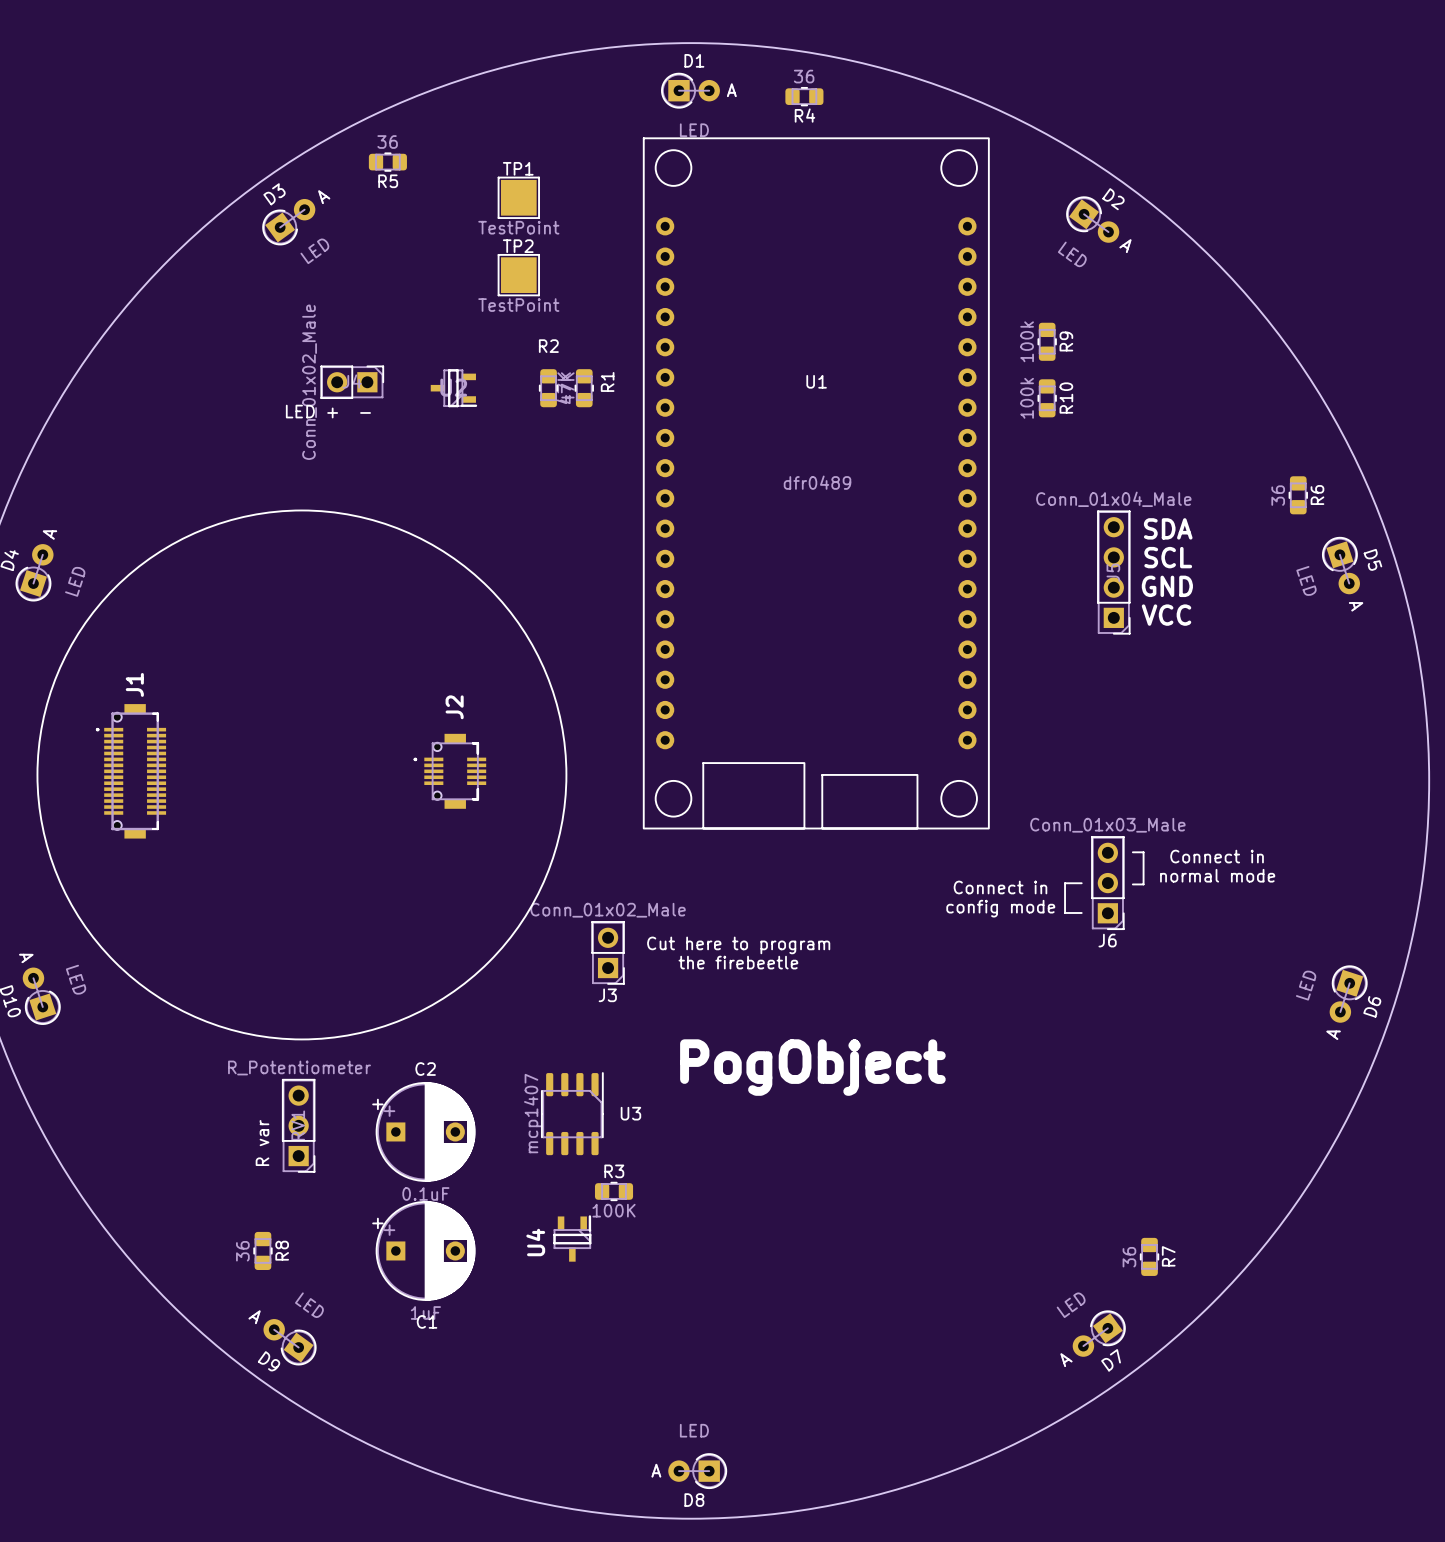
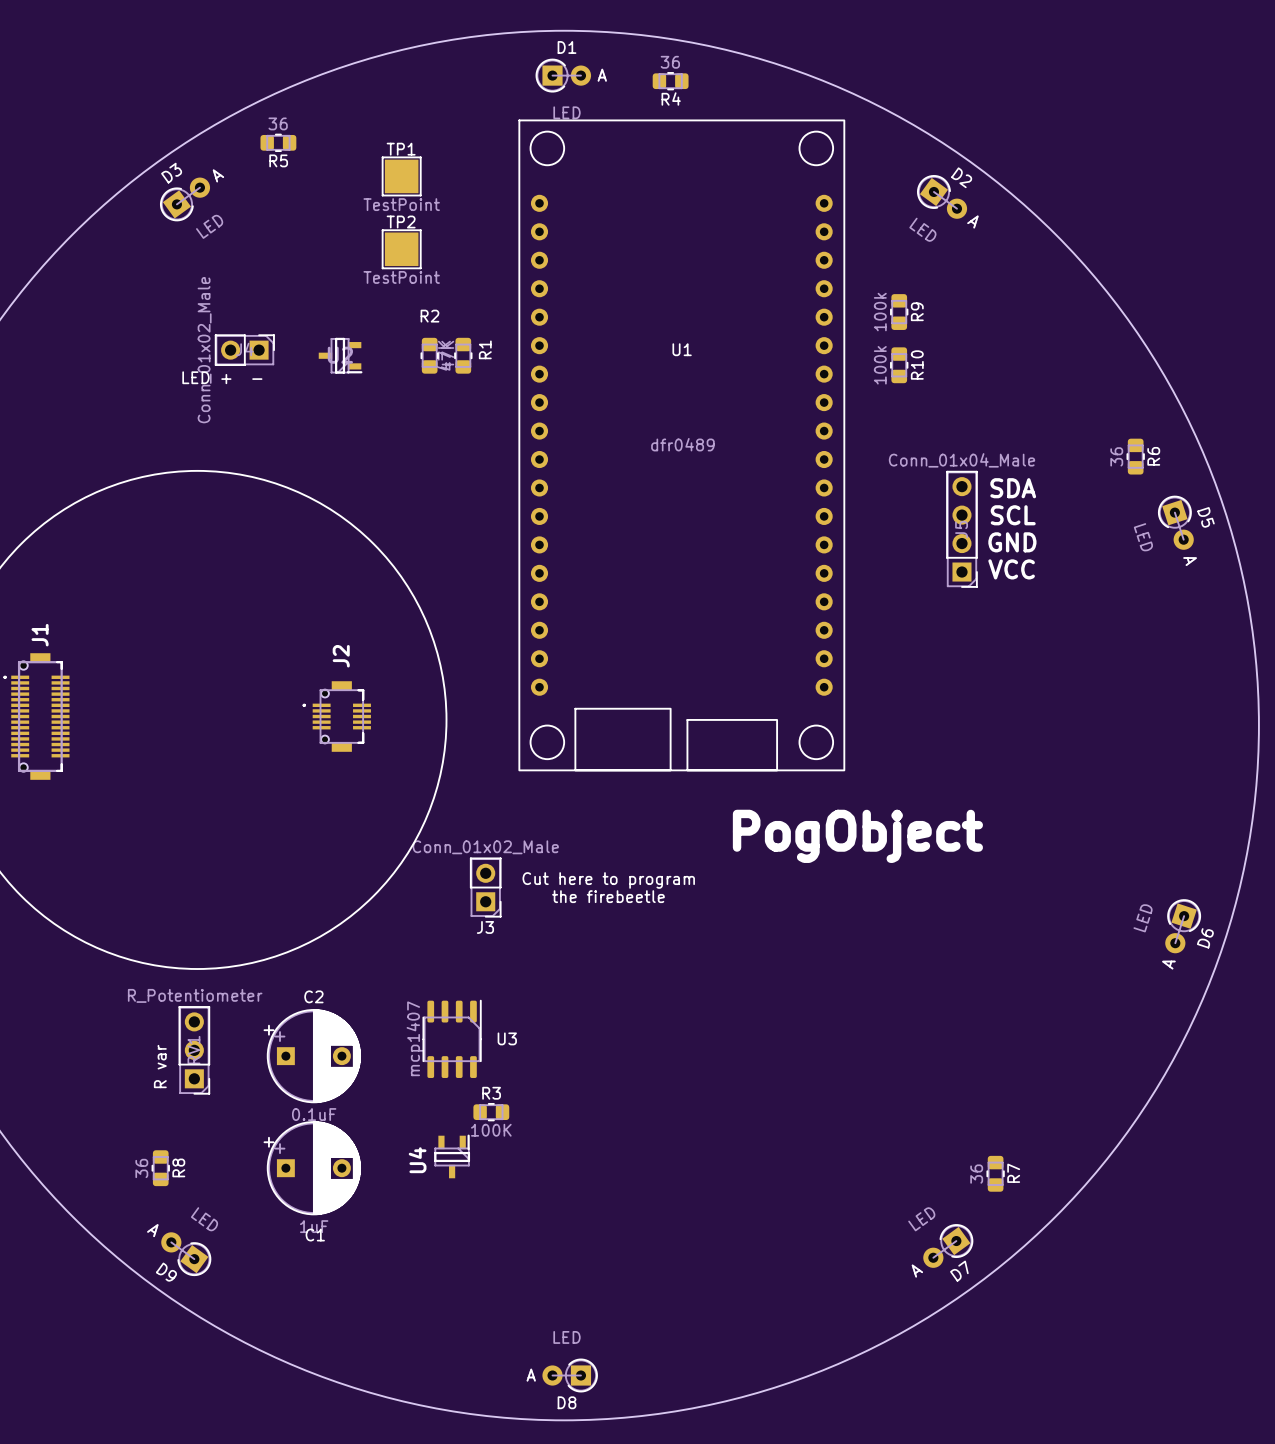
line: (1132, 852) (1143, 852) (1143, 884) (1132, 884) -> none
text: Connect in (1217, 856) -> none
text: normal mode (1217, 875) -> none
line: (1081, 883) (1065, 883) (1065, 912) (1081, 912) -> none
J6: Conn_01x03_Male (1107, 883) -> none
text: Connect in (1000, 887) -> PogObject (857, 836)
text: config mode (1000, 908) -> none
text: PogObject (812, 1067) -> none

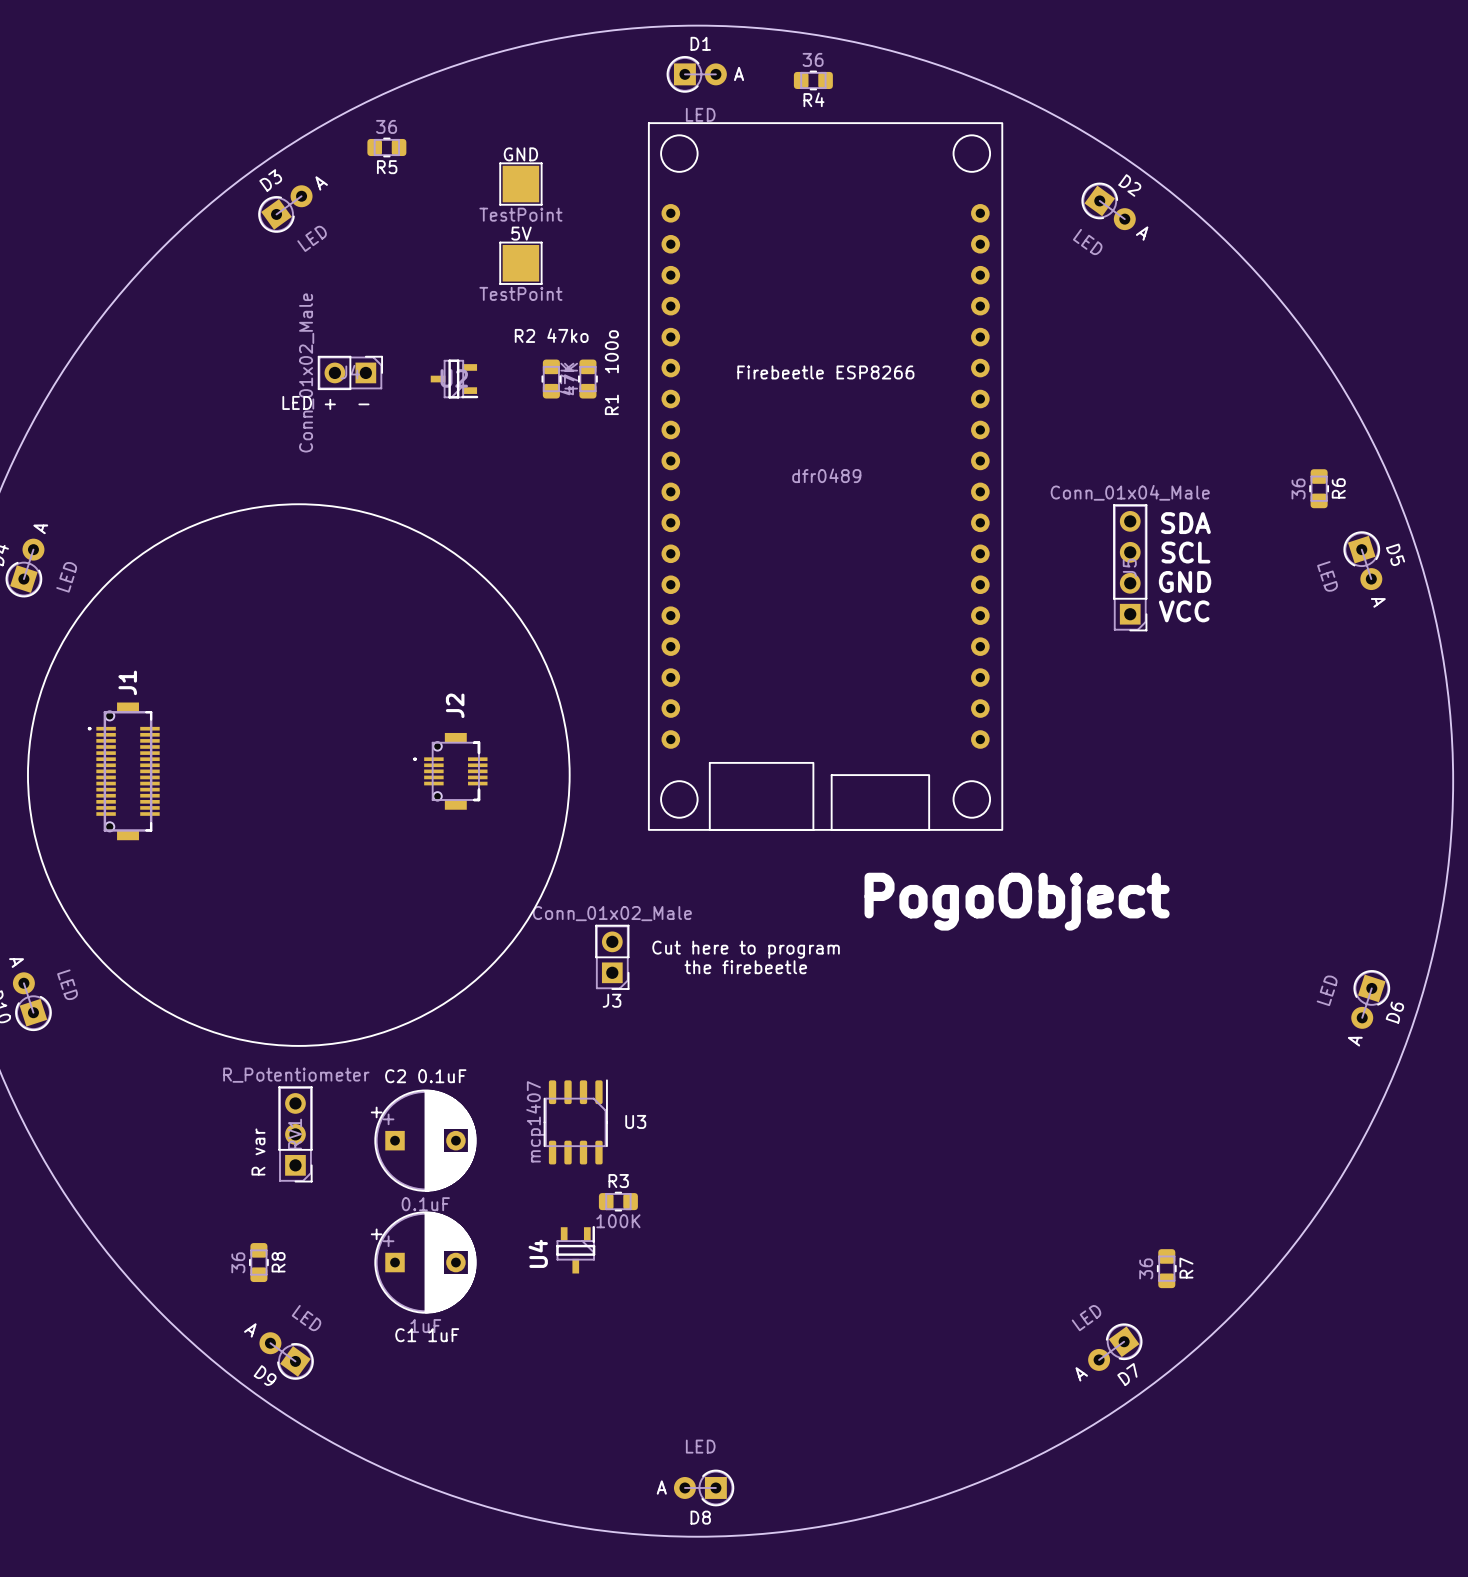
TP1 name: TP1 (401, 149) -> GND (520, 154)
TP2 name: TP2 (401, 221) -> 5V (521, 233)
R9: 100k (899, 312) -> none
R2 name: R2 (429, 316) -> R2 47ko (551, 335)
R1 name: R1 (485, 349) -> R1 100o (611, 372)
U1 name: U1 (682, 349) -> Firebeetle ESP8266 (825, 372)
R10: 100k (899, 365) -> none
text: PogObject (857, 836) -> PogoObject (1017, 901)
C2 name: C2 (313, 996) -> C2 0.1uF (425, 1076)
C1 name: C1 (315, 1235) -> C1 1uF (427, 1335)

